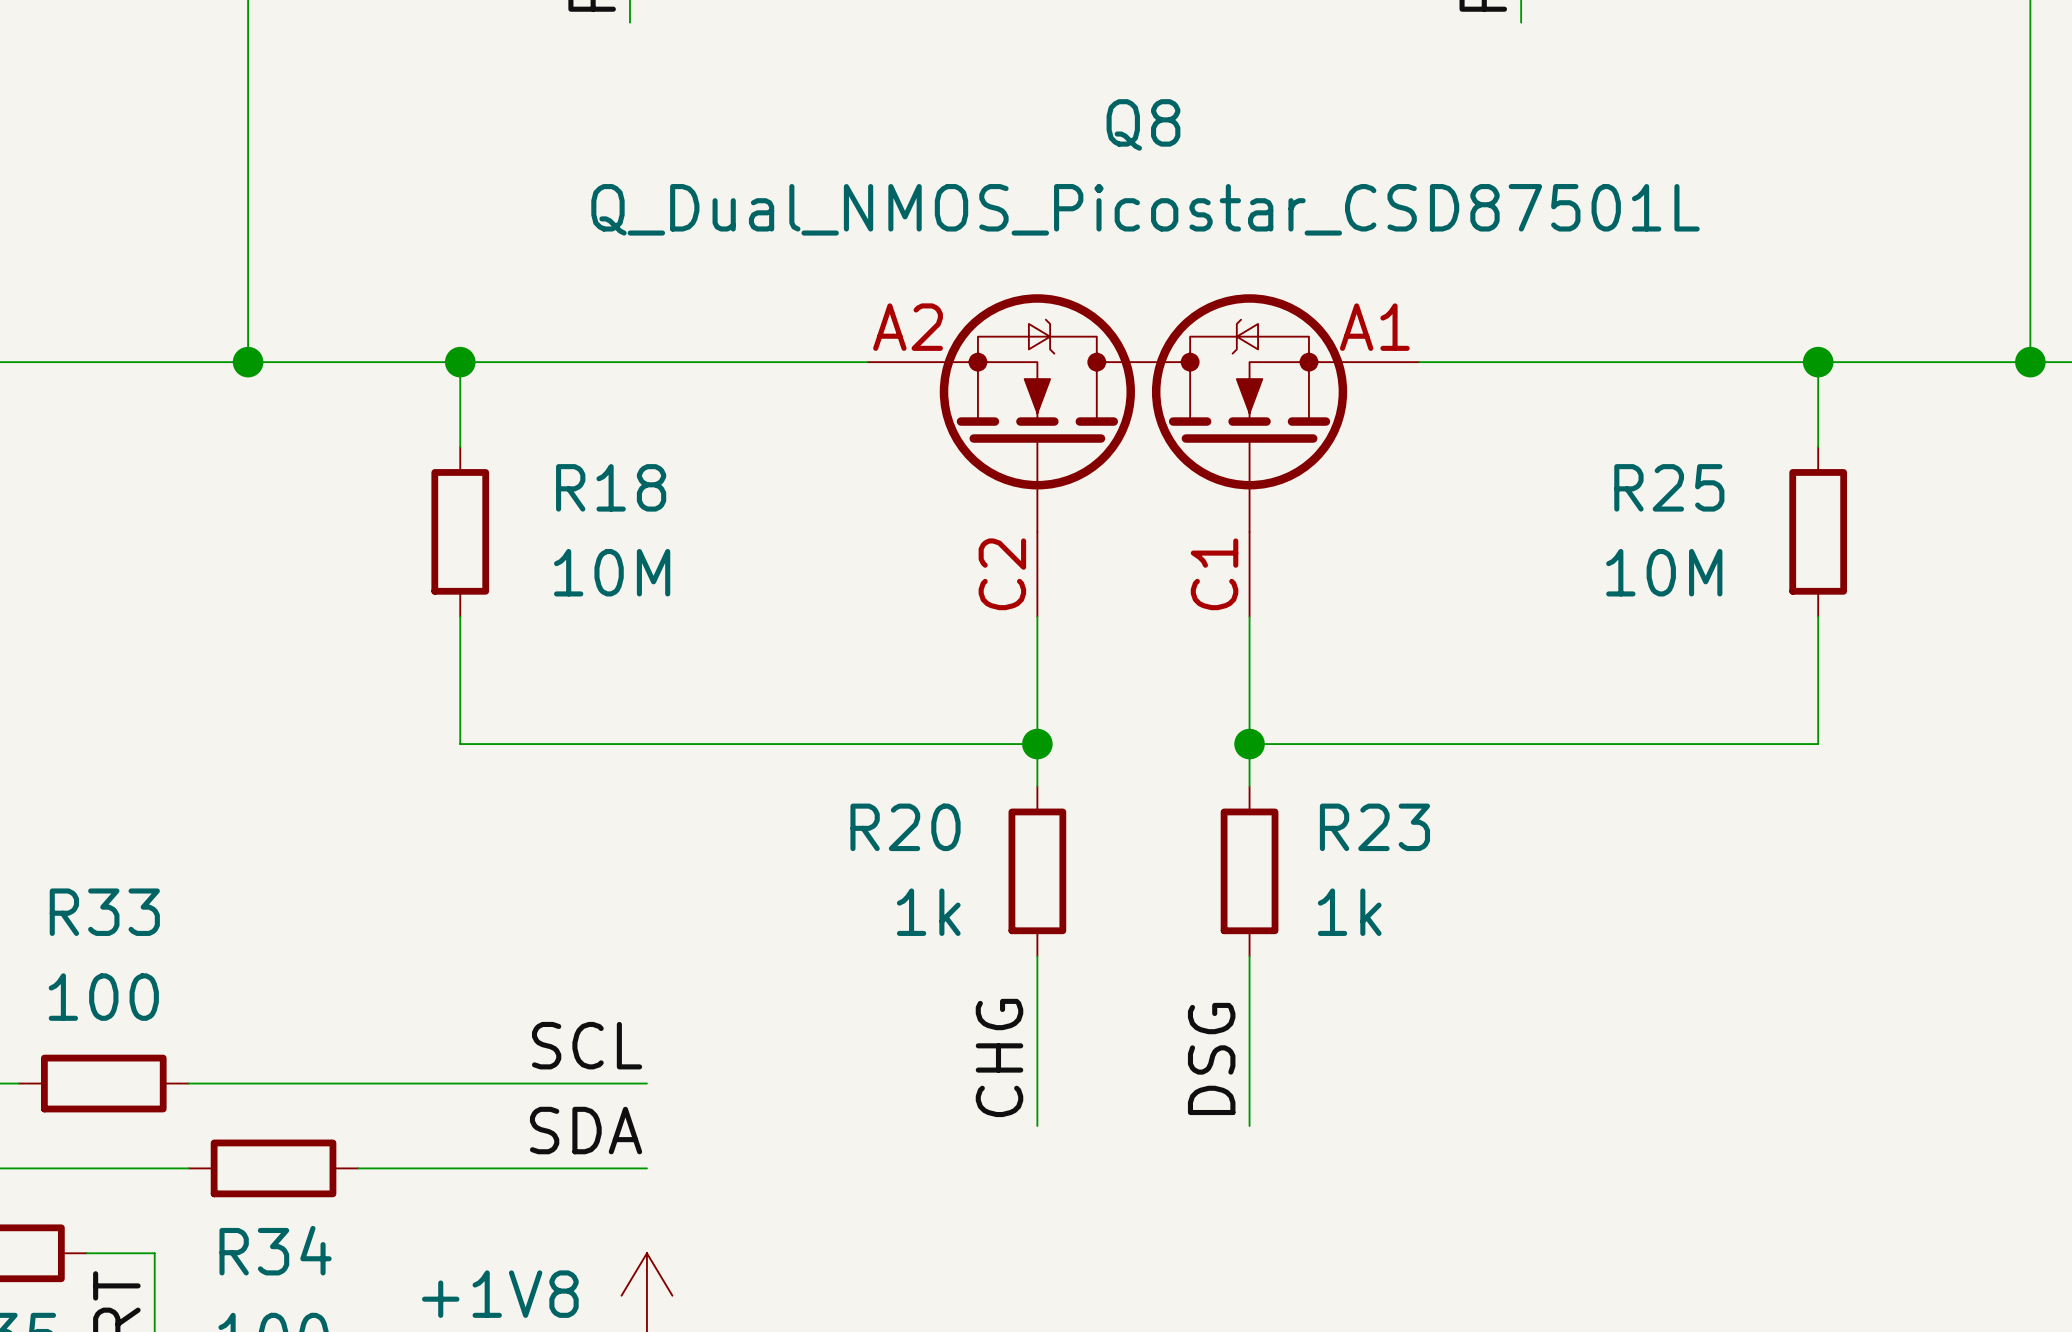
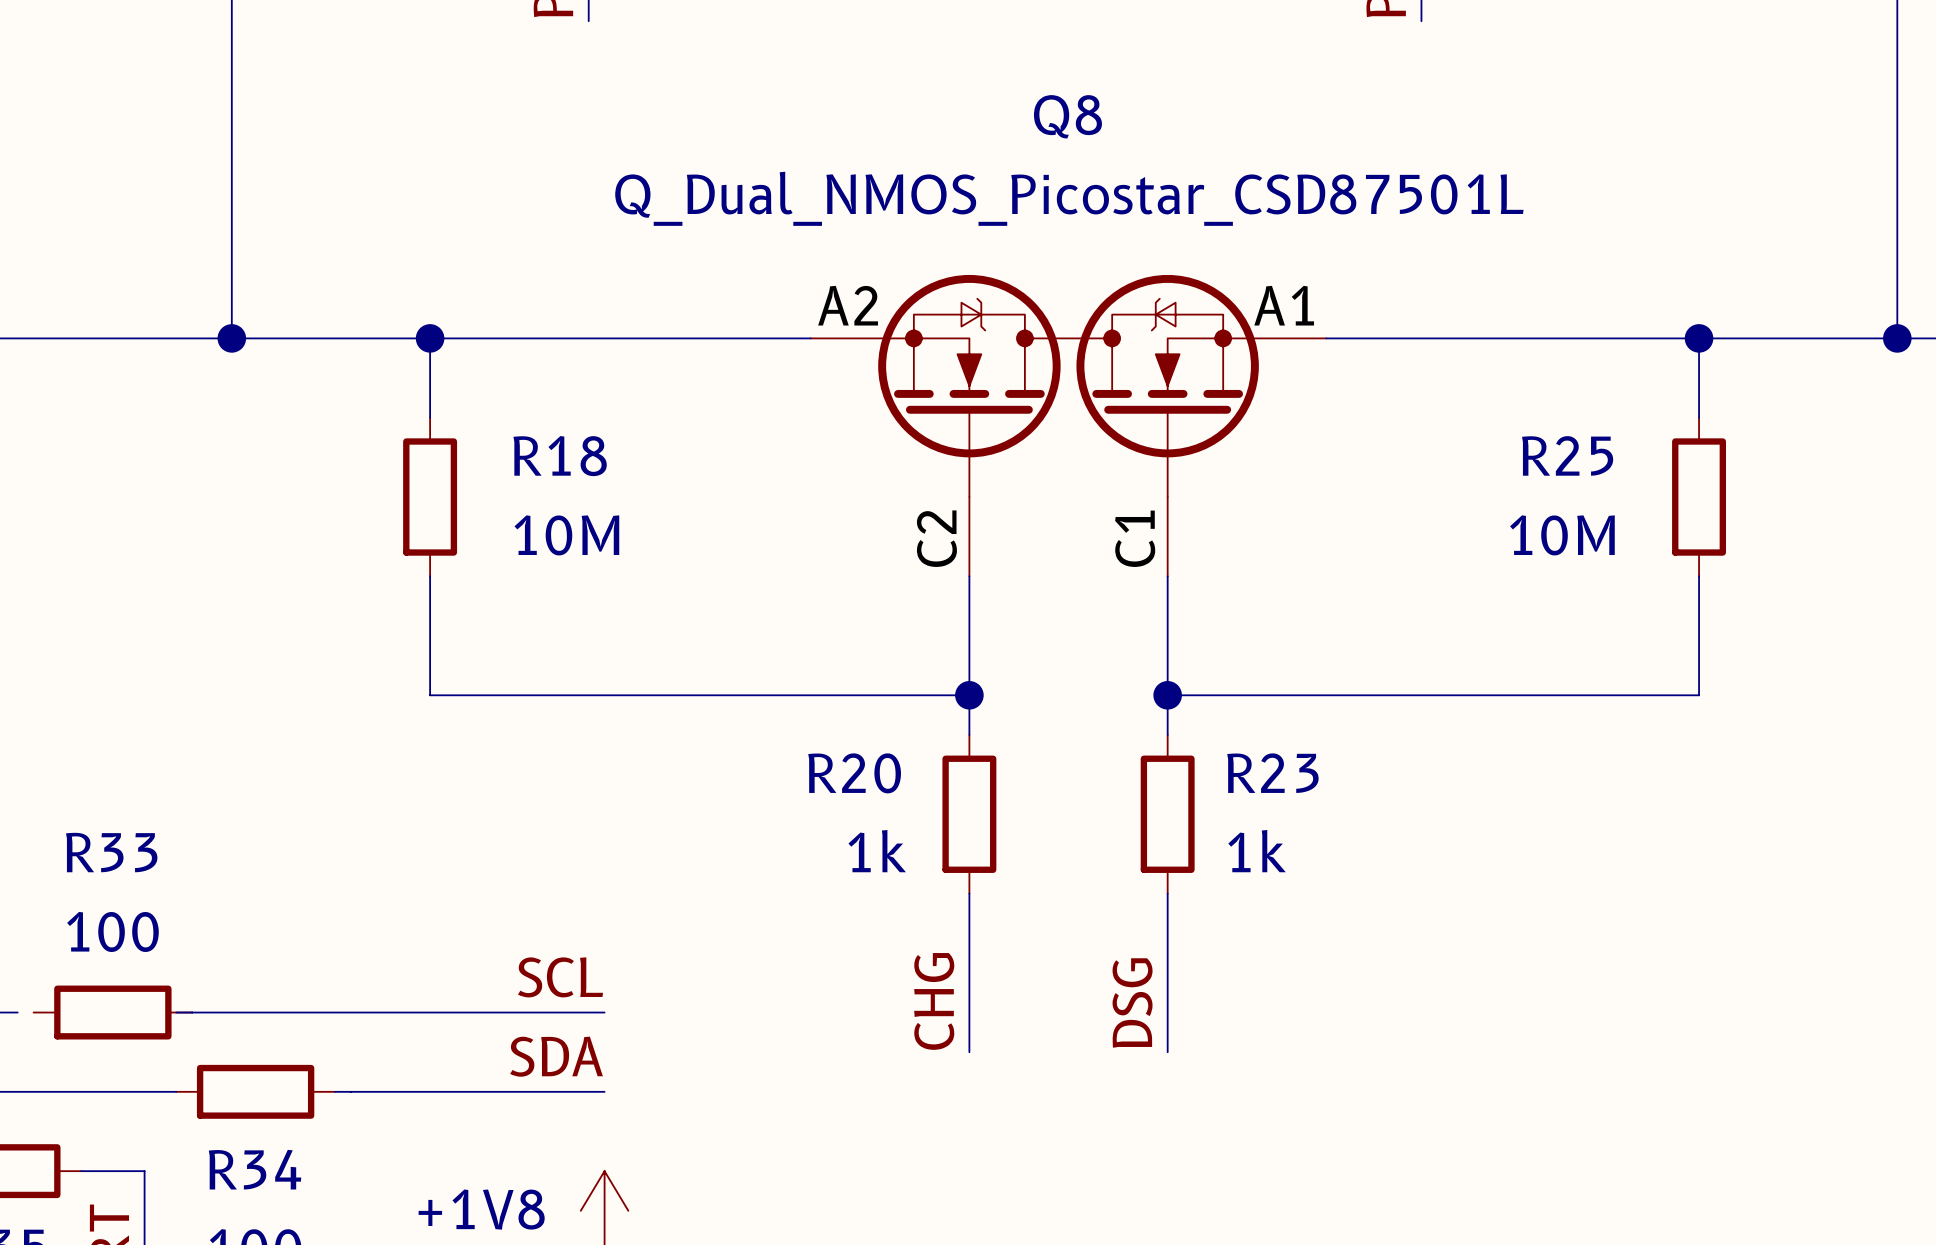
R33 position: (103, 1083) -> (112, 1012)

